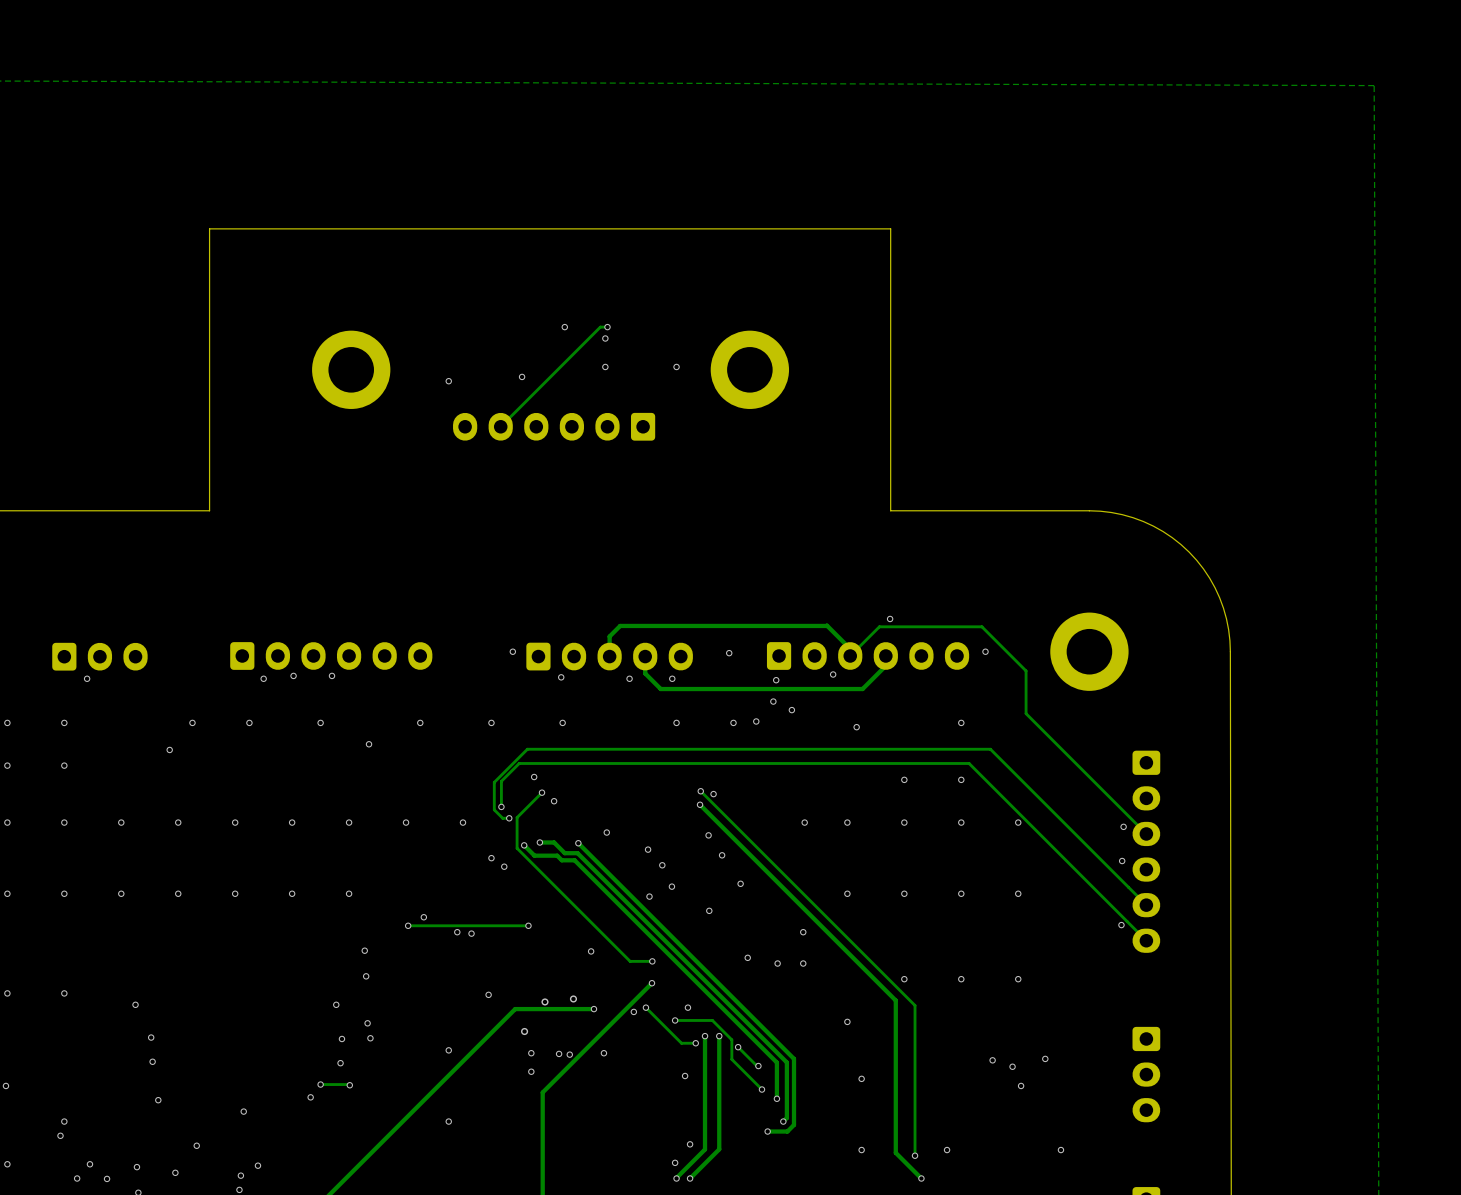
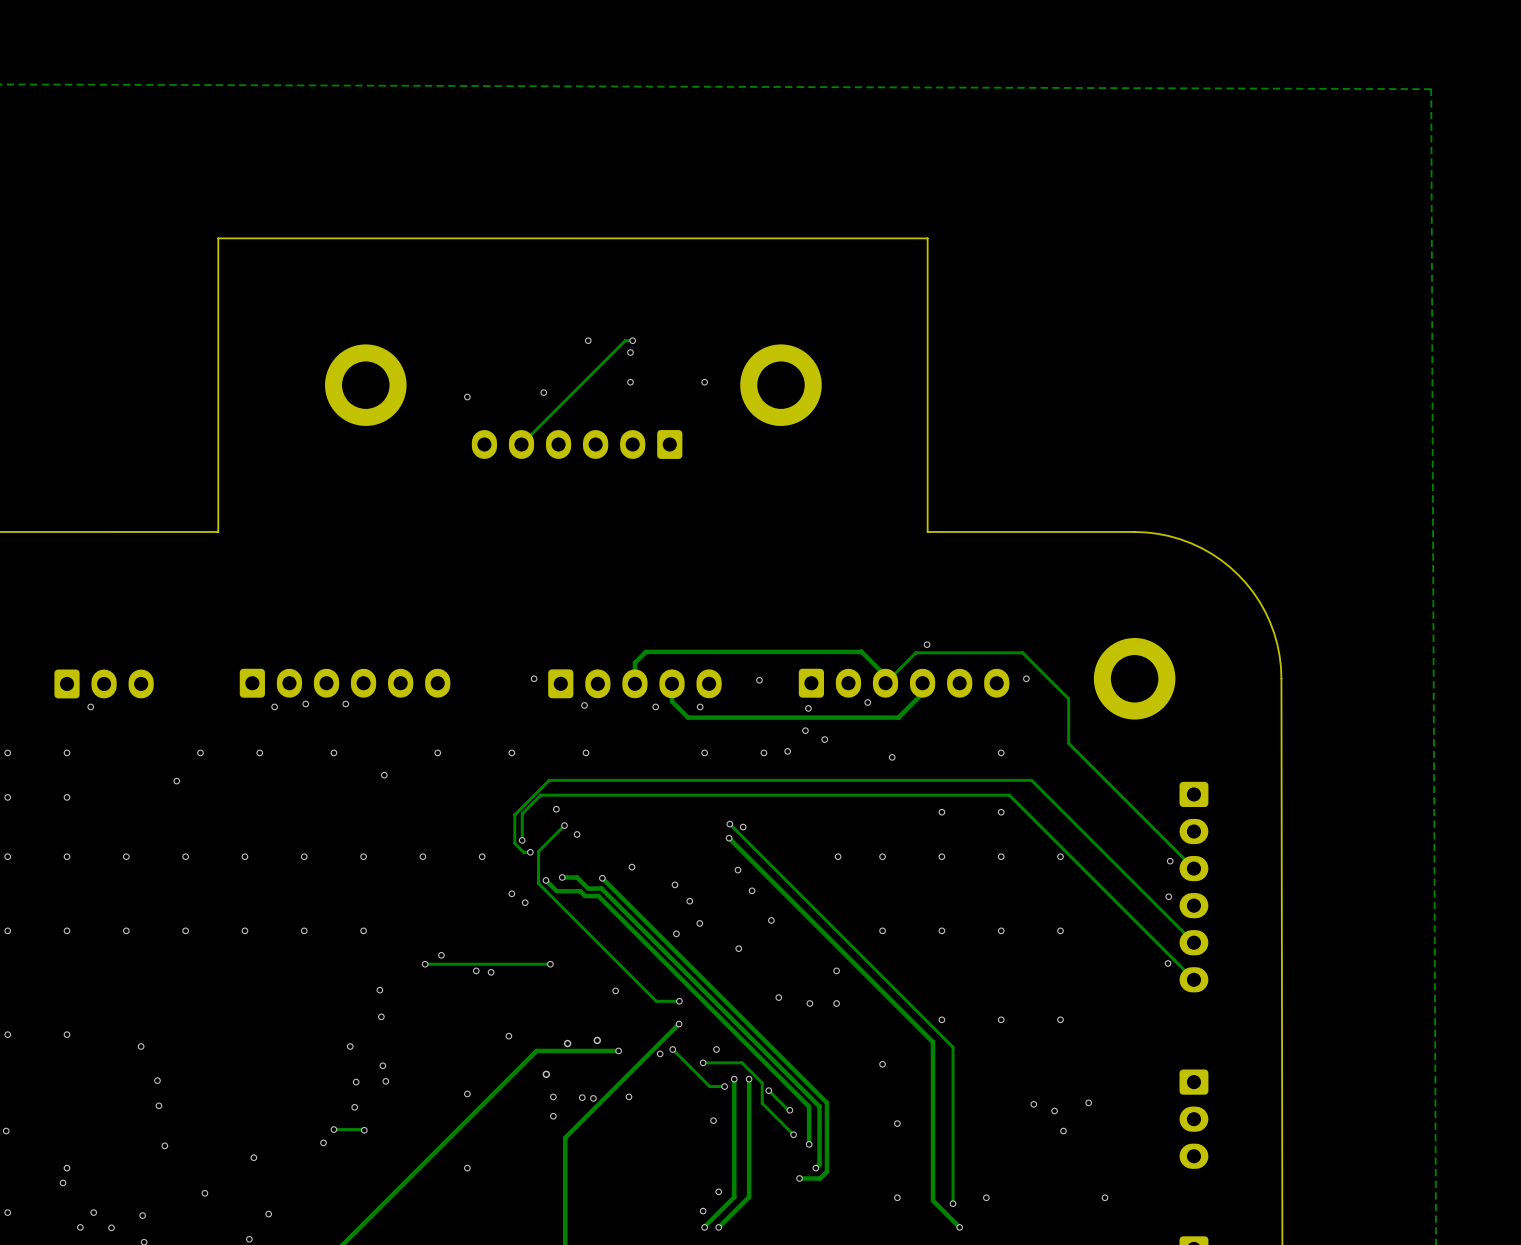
via: (175, 1172) -> none
via: (240, 1175) -> none

